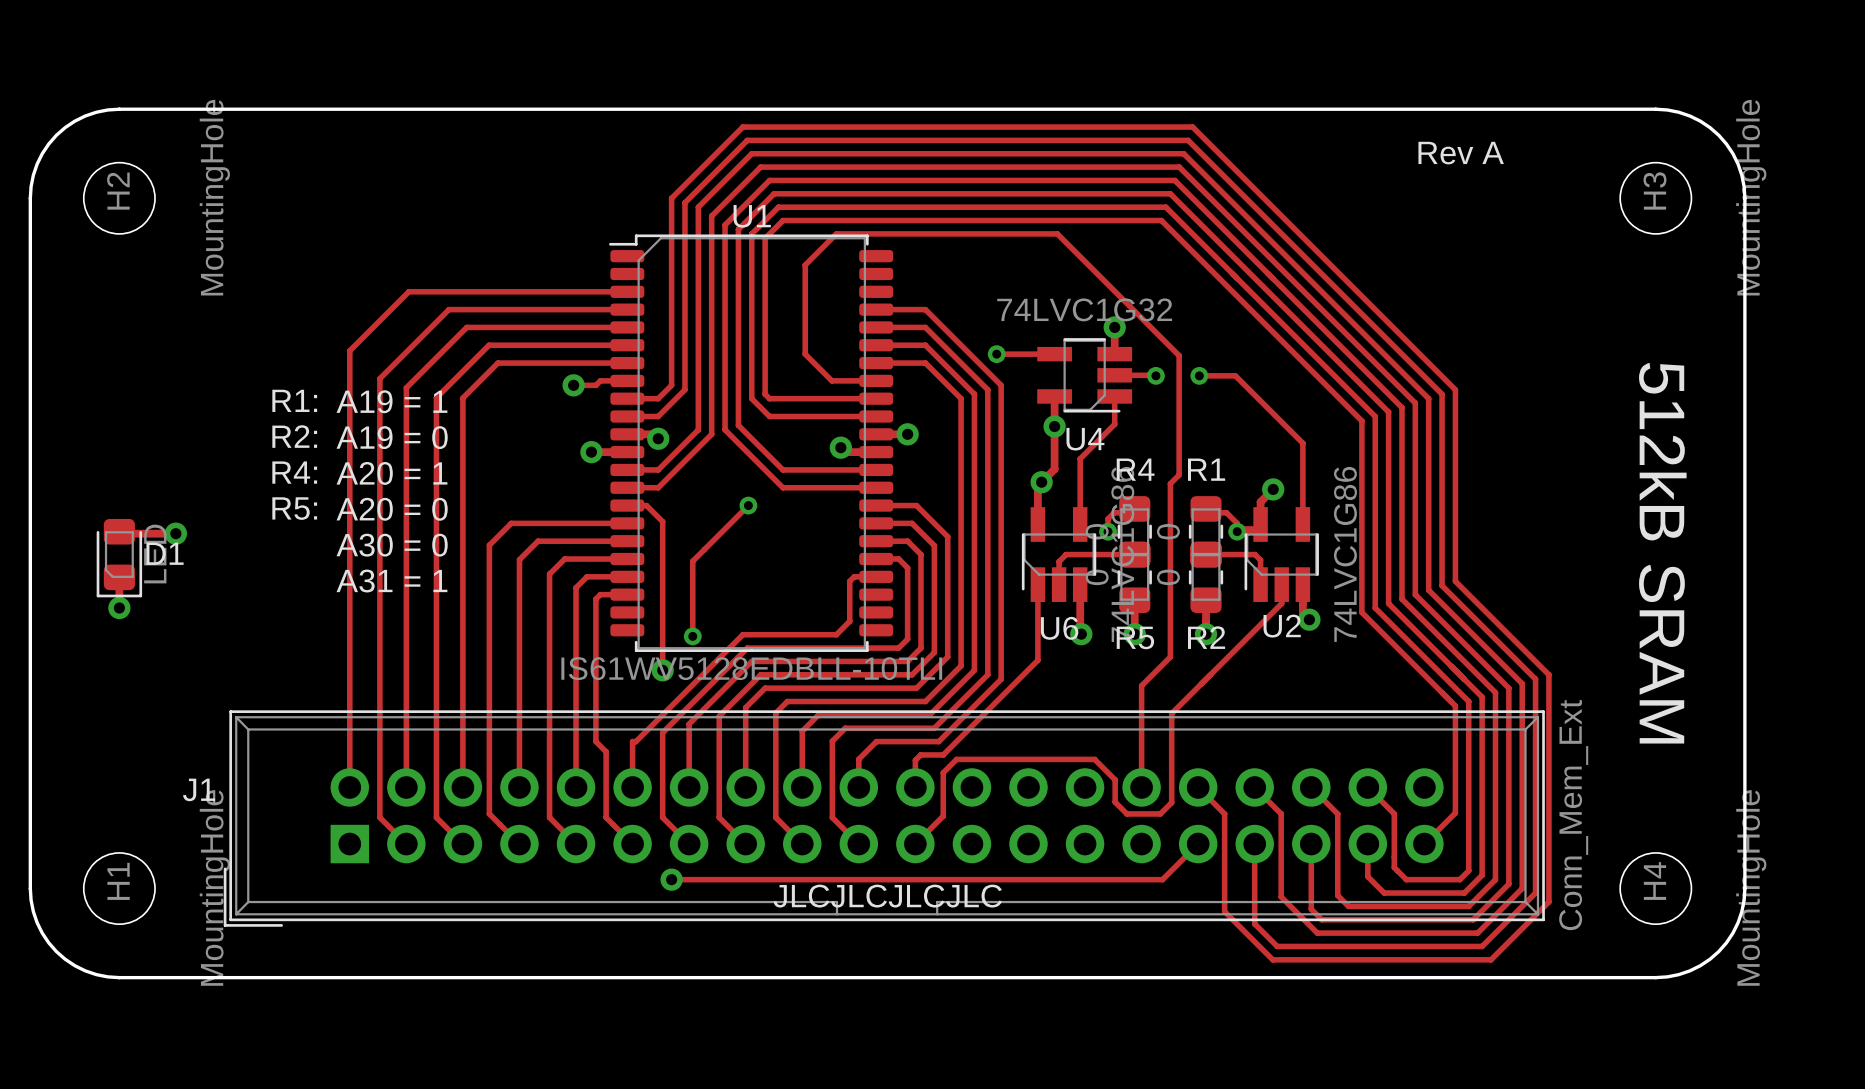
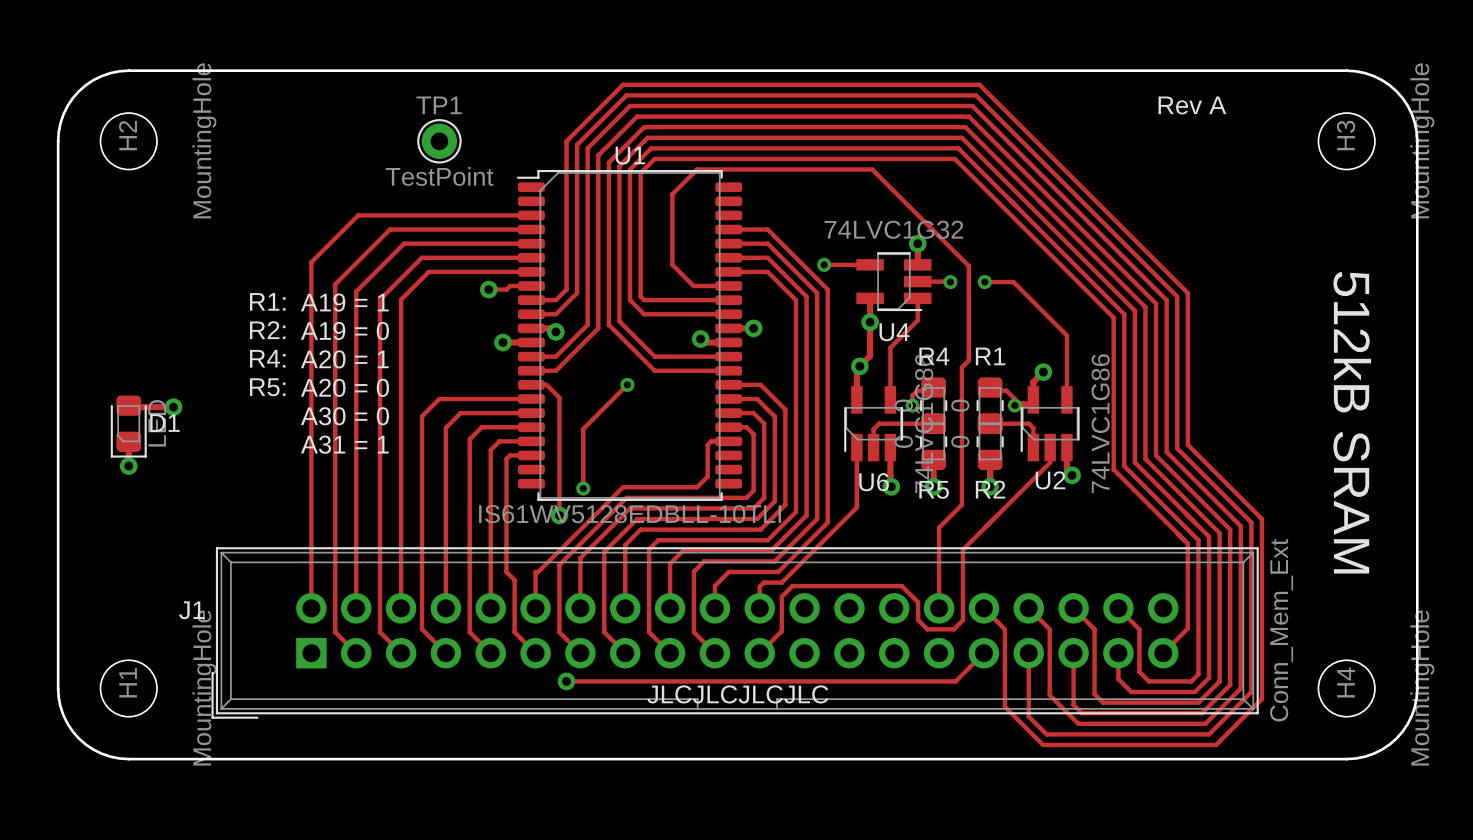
TP1: none -> TestPoint (439, 141)

